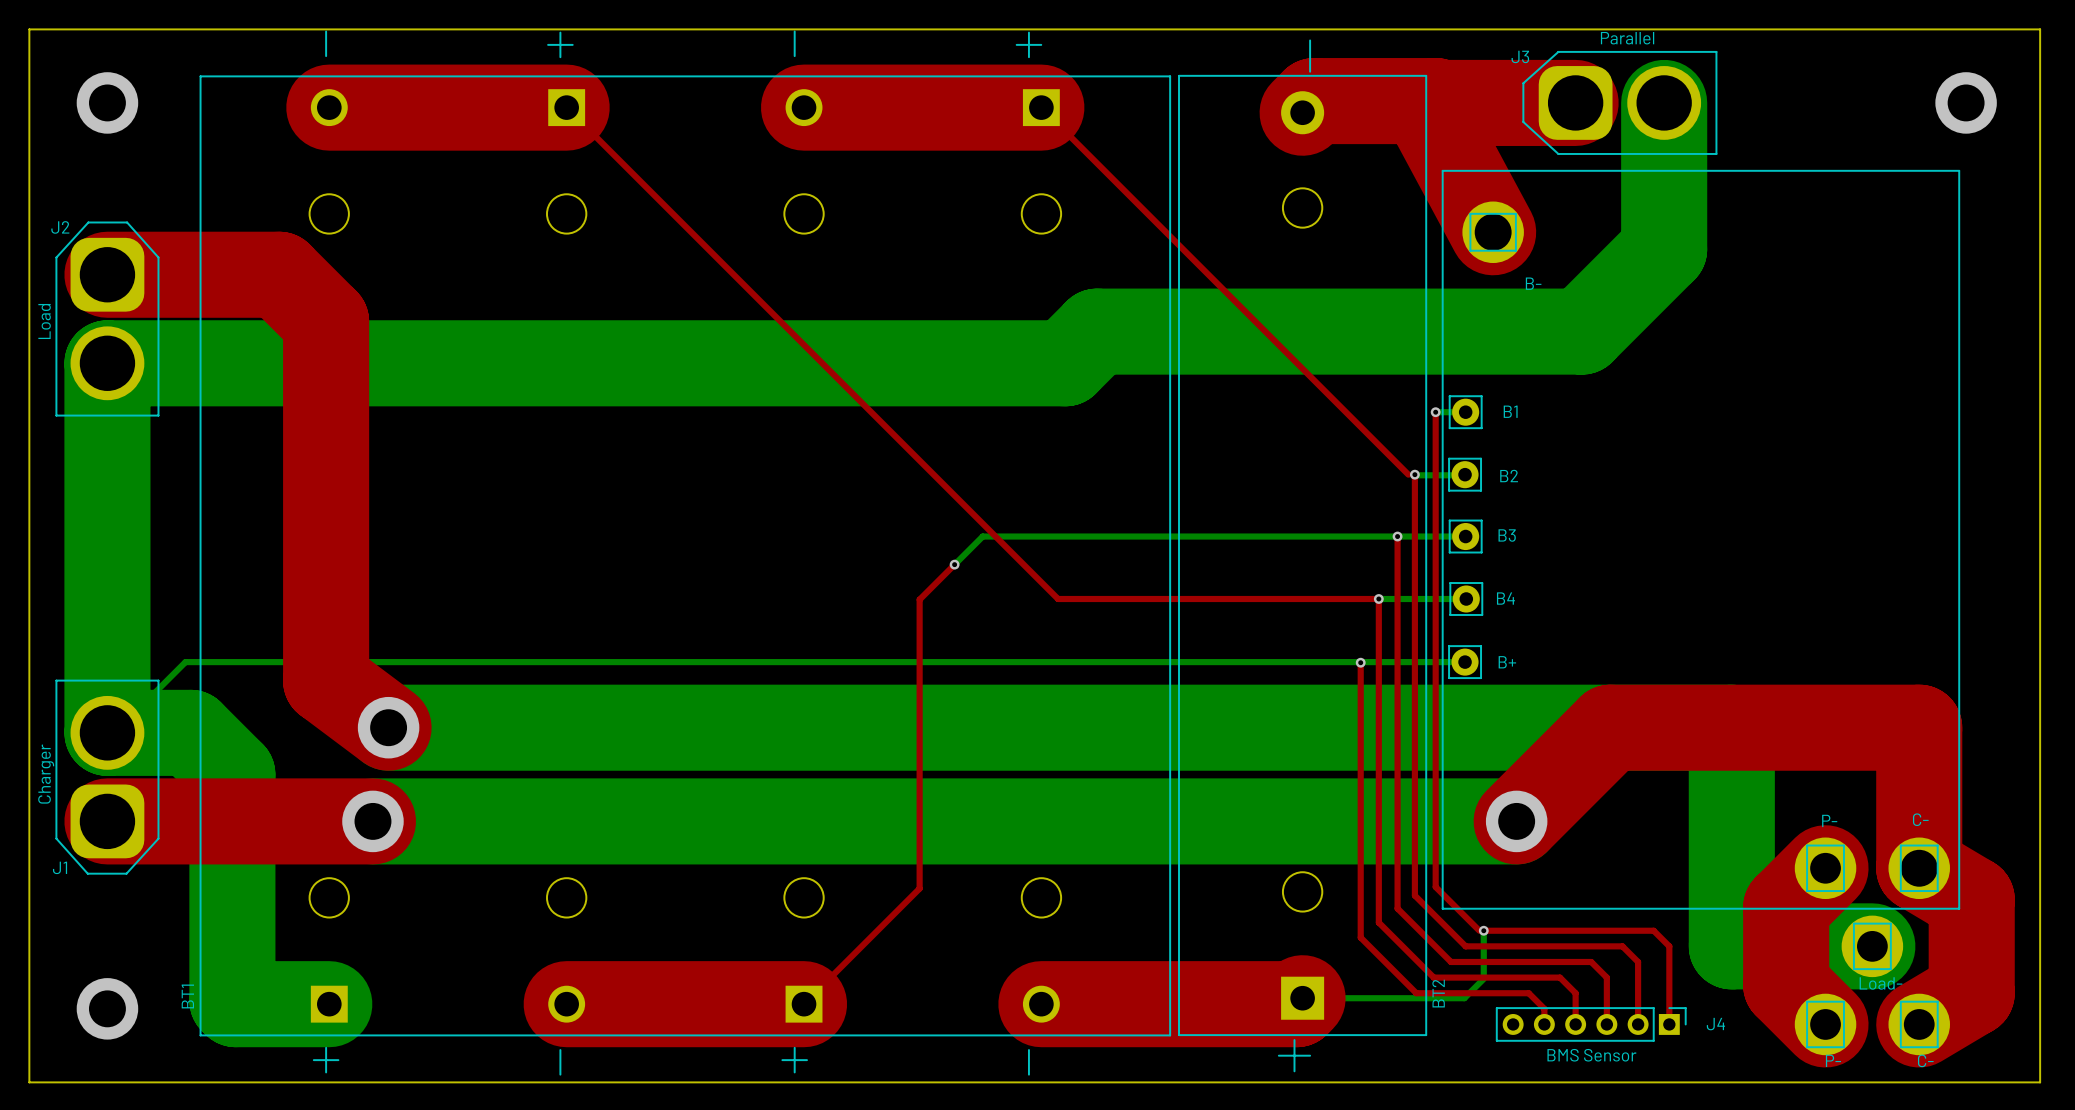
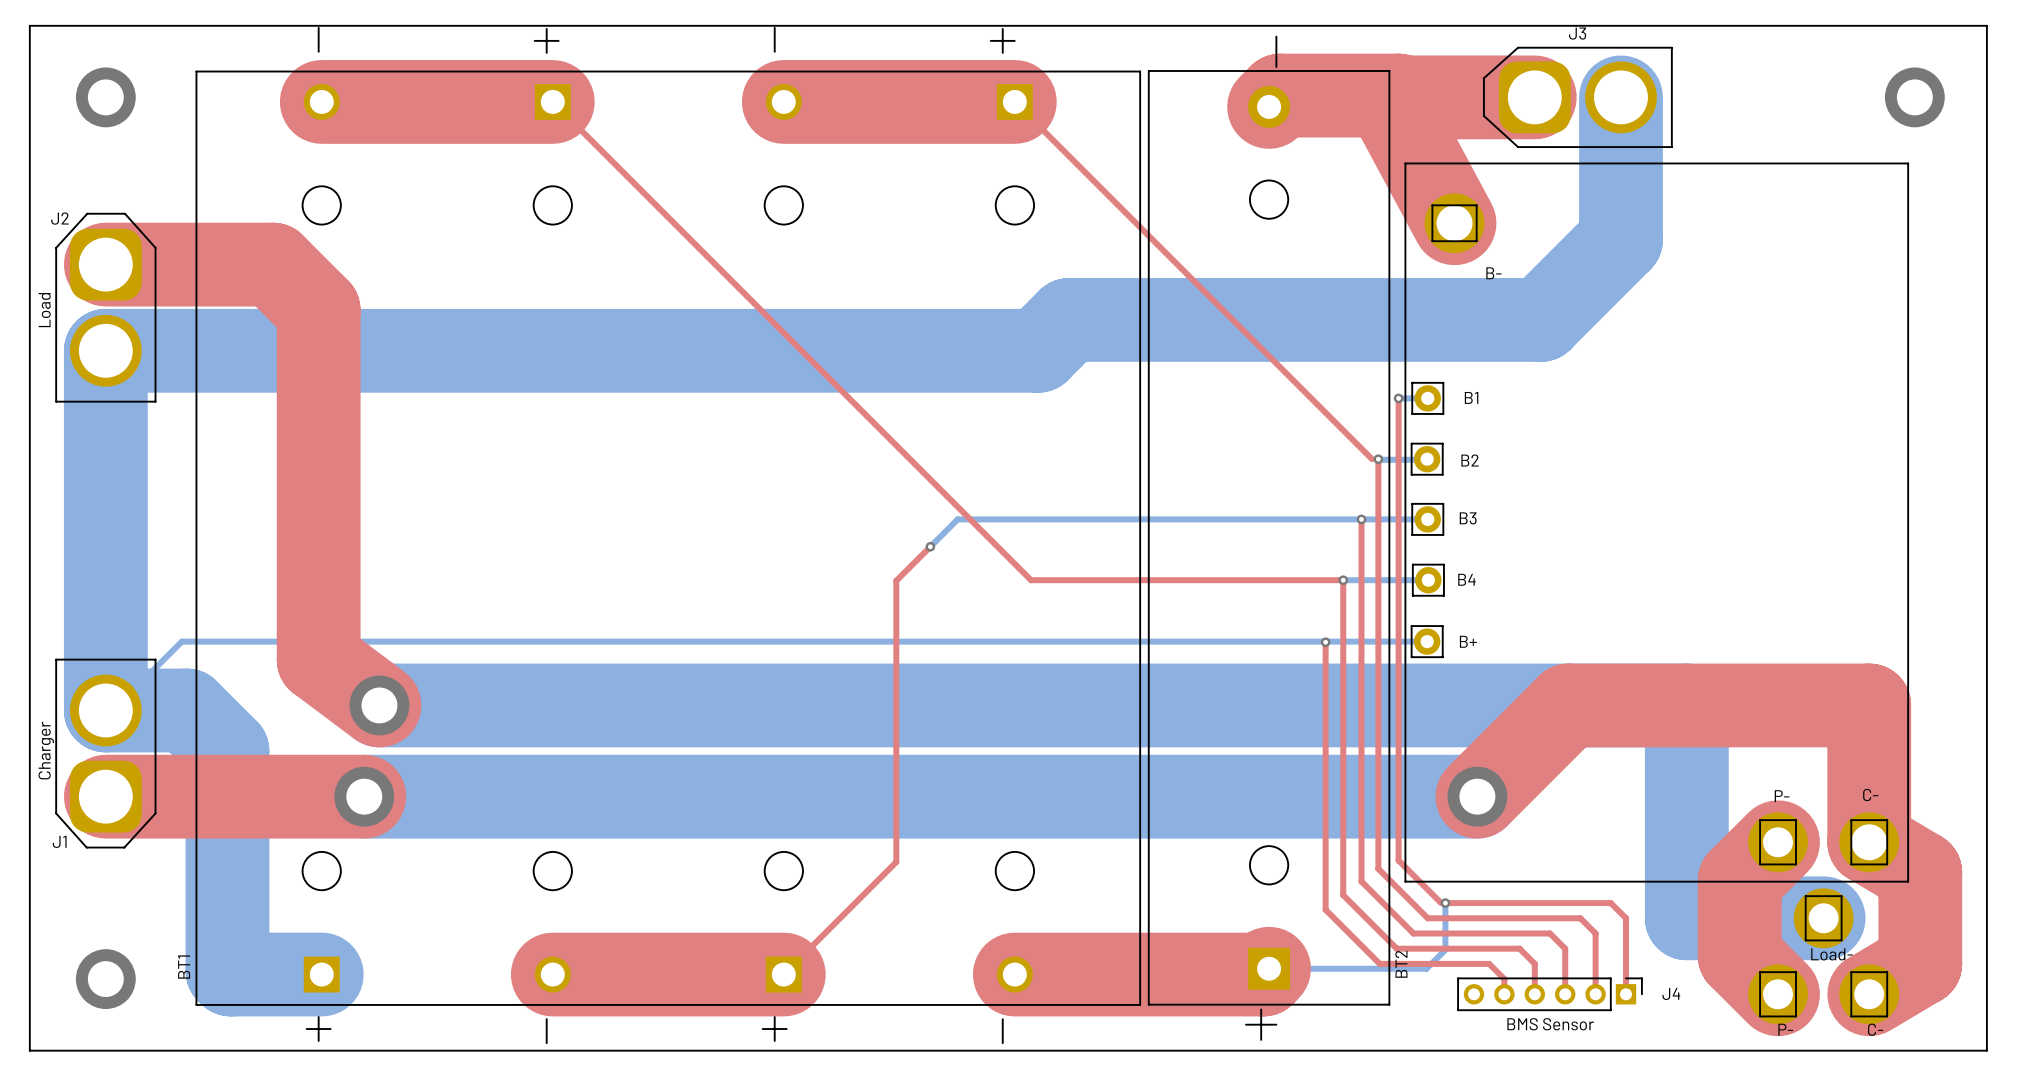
J3 value: Parallel (1627, 38) -> none
J3 name position: J3 (1520, 56) -> J3 (1577, 33)

